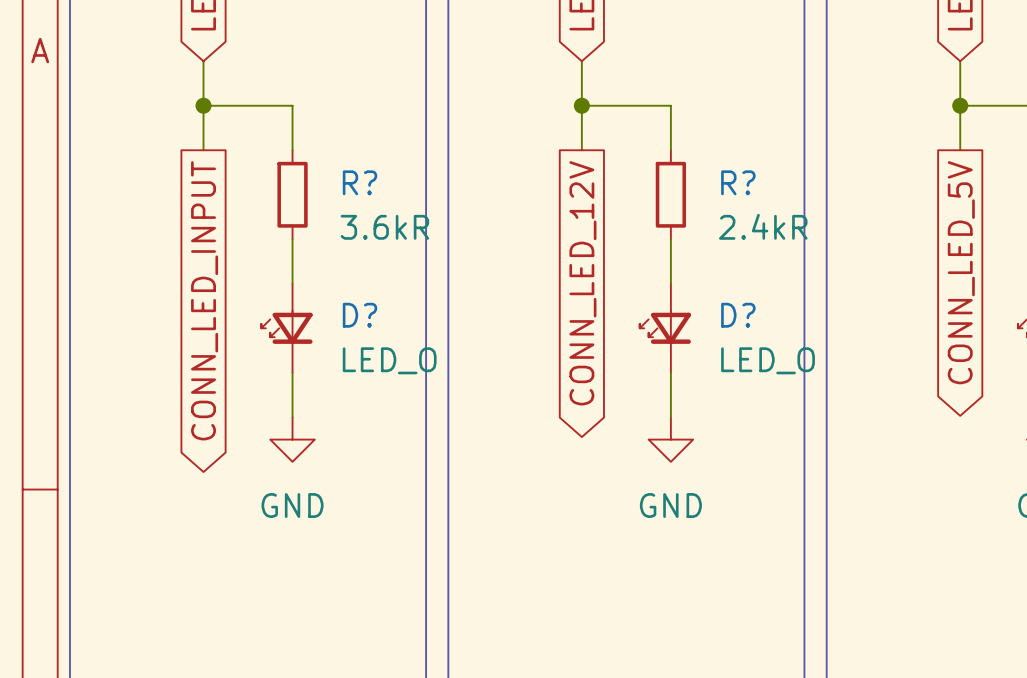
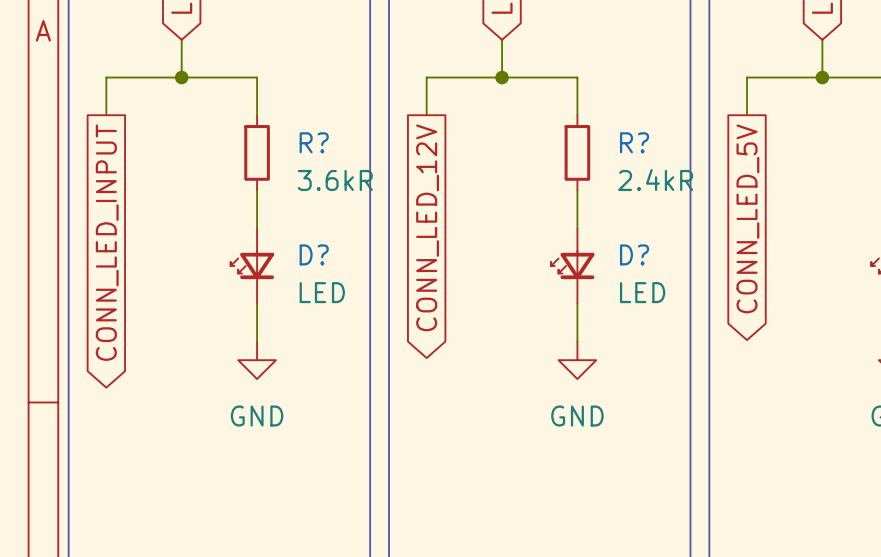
wire: (203, 105) (203, 150) -> (181, 77) (106, 77) (106, 115)
wire: (581, 105) (581, 150) -> (502, 77) (426, 77) (426, 115)
wire: (960, 105) (960, 150) -> (822, 77) (747, 77) (747, 115)
global label position: CONN_LED_5V (961, 272) -> CONN_LED_5V (747, 218)
global label position: CONN_LED_12V (582, 283) -> CONN_LED_12V (427, 227)
global label position: CONN_LED_INPUT (204, 300) -> CONN_LED_INPUT (107, 242)
D? value: LED_O (389, 360) -> LED (322, 292)
D? value: LED_O (768, 360) -> LED (642, 292)

